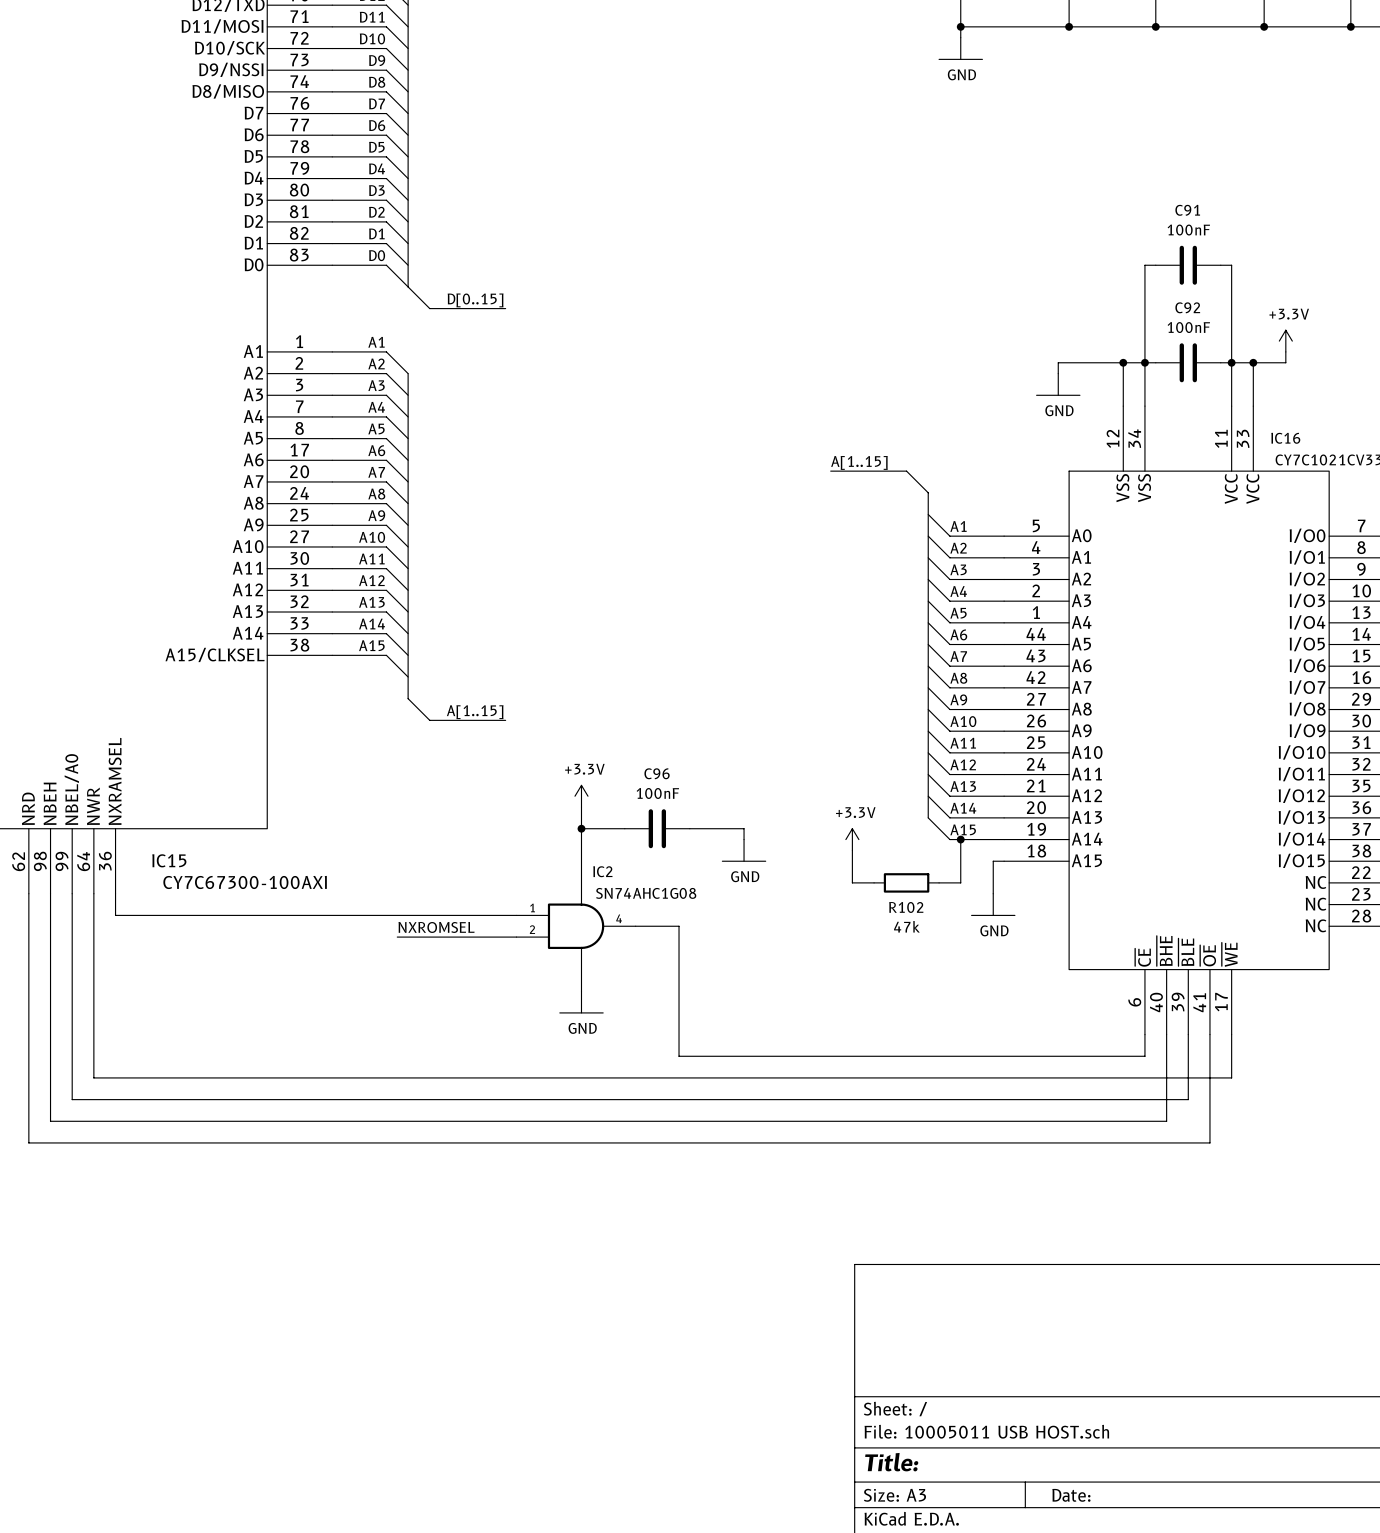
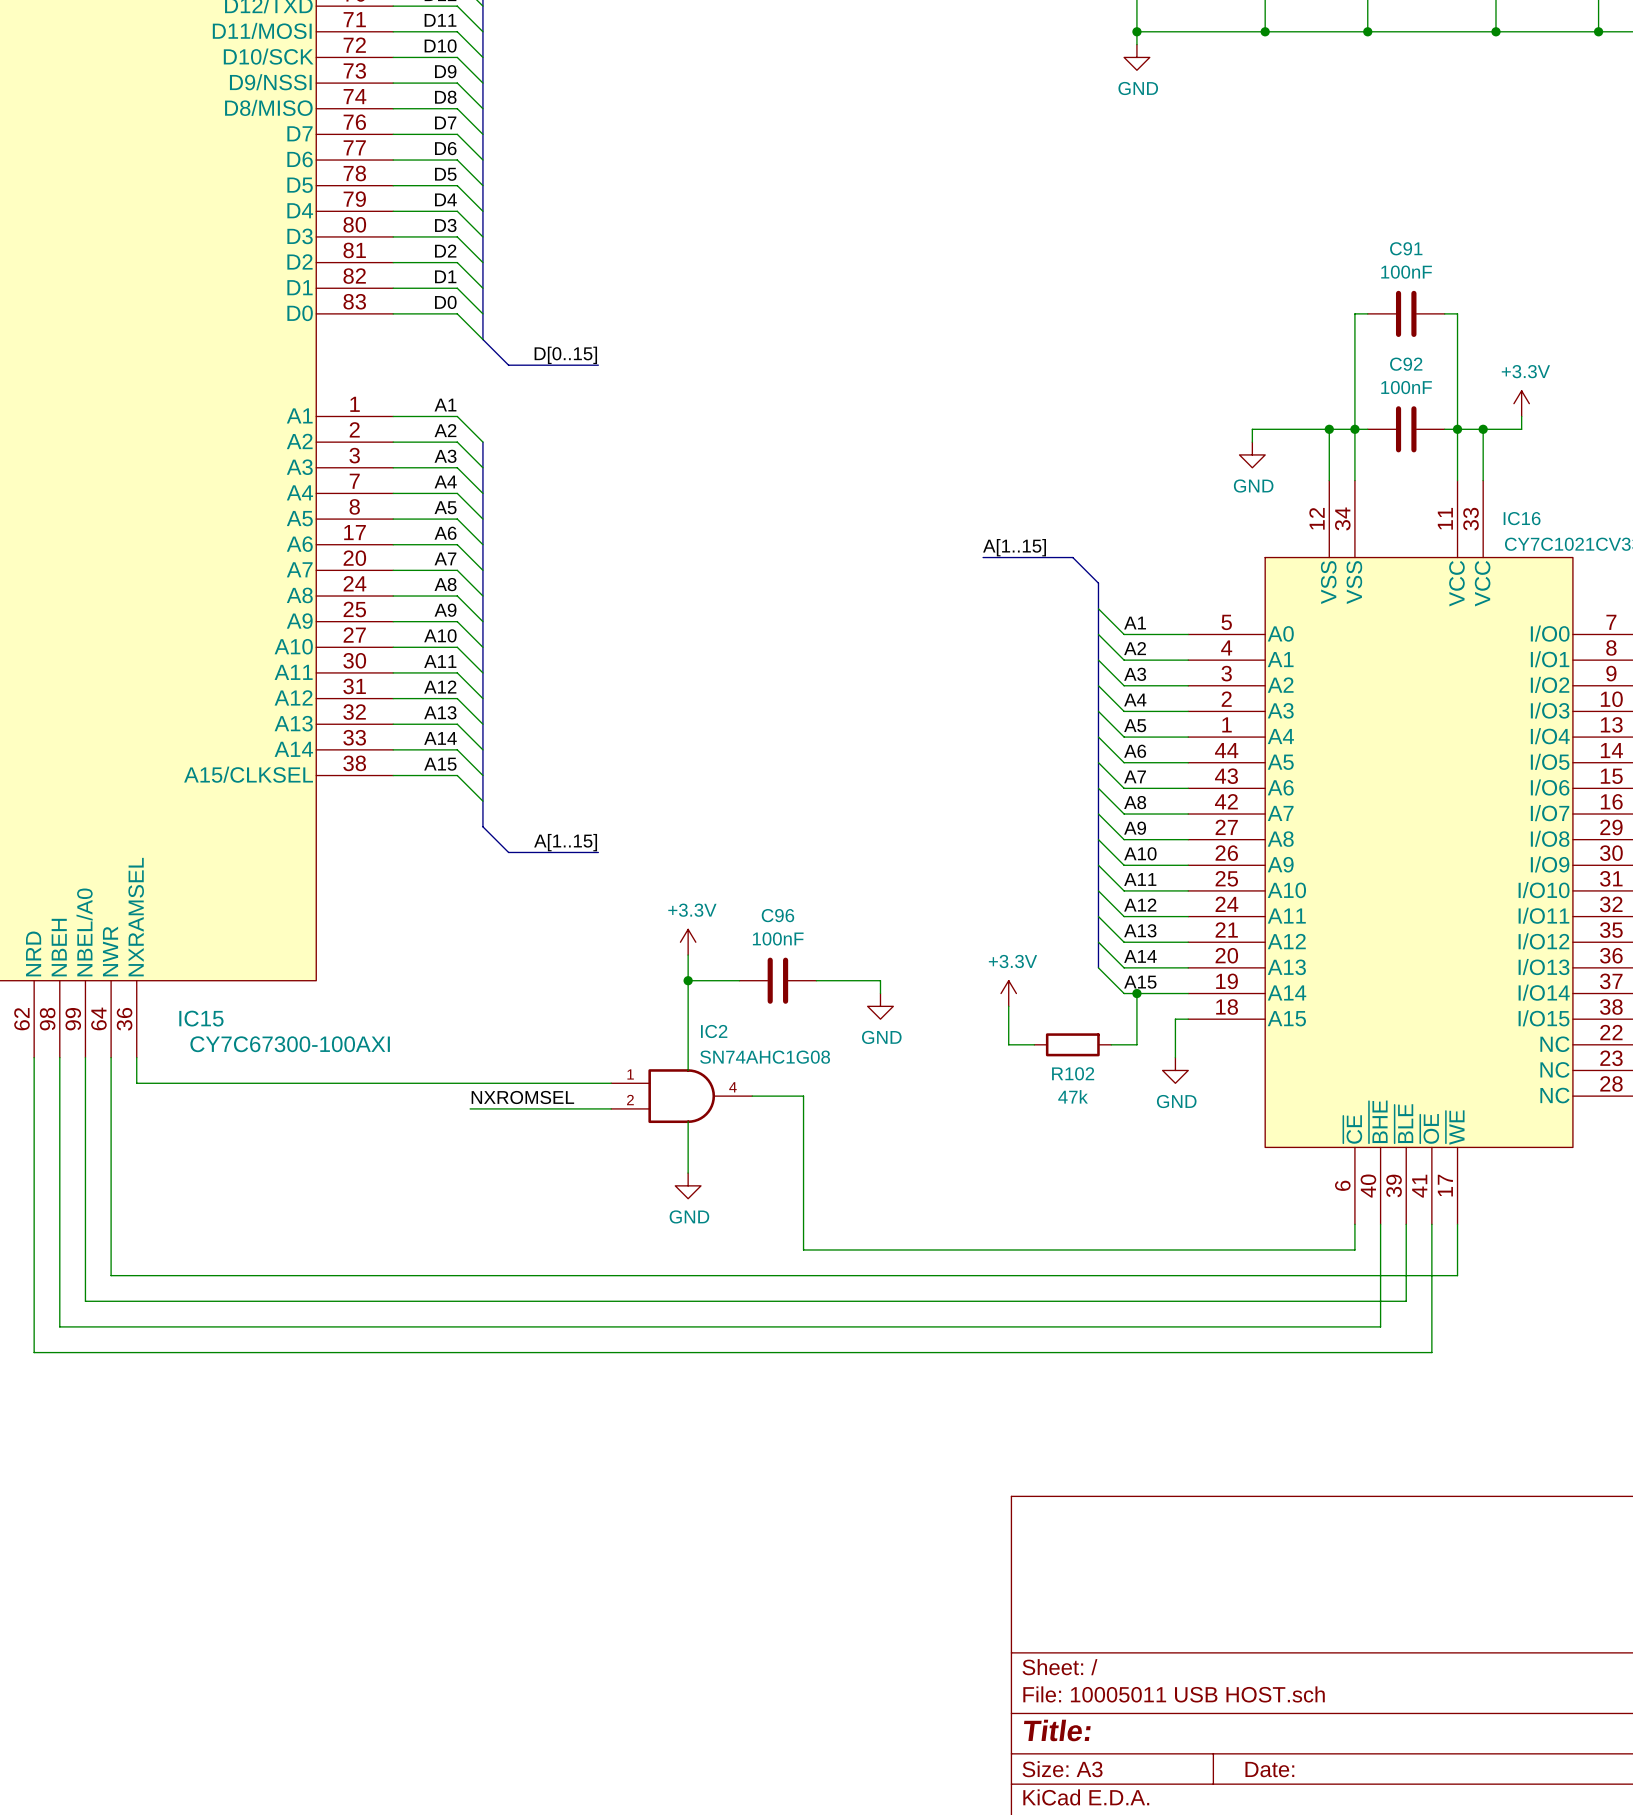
power symbol shape: [939, 37, 983, 60] -> [1124, 44, 1150, 71]
power symbol shape: [1036, 373, 1080, 396] -> [1239, 442, 1266, 468]
power symbol shape: [722, 839, 766, 862] -> [867, 993, 894, 1020]
power symbol shape: [971, 893, 1015, 916] -> [1162, 1057, 1189, 1084]
power symbol shape: [559, 991, 604, 1013] -> [675, 1173, 701, 1199]

